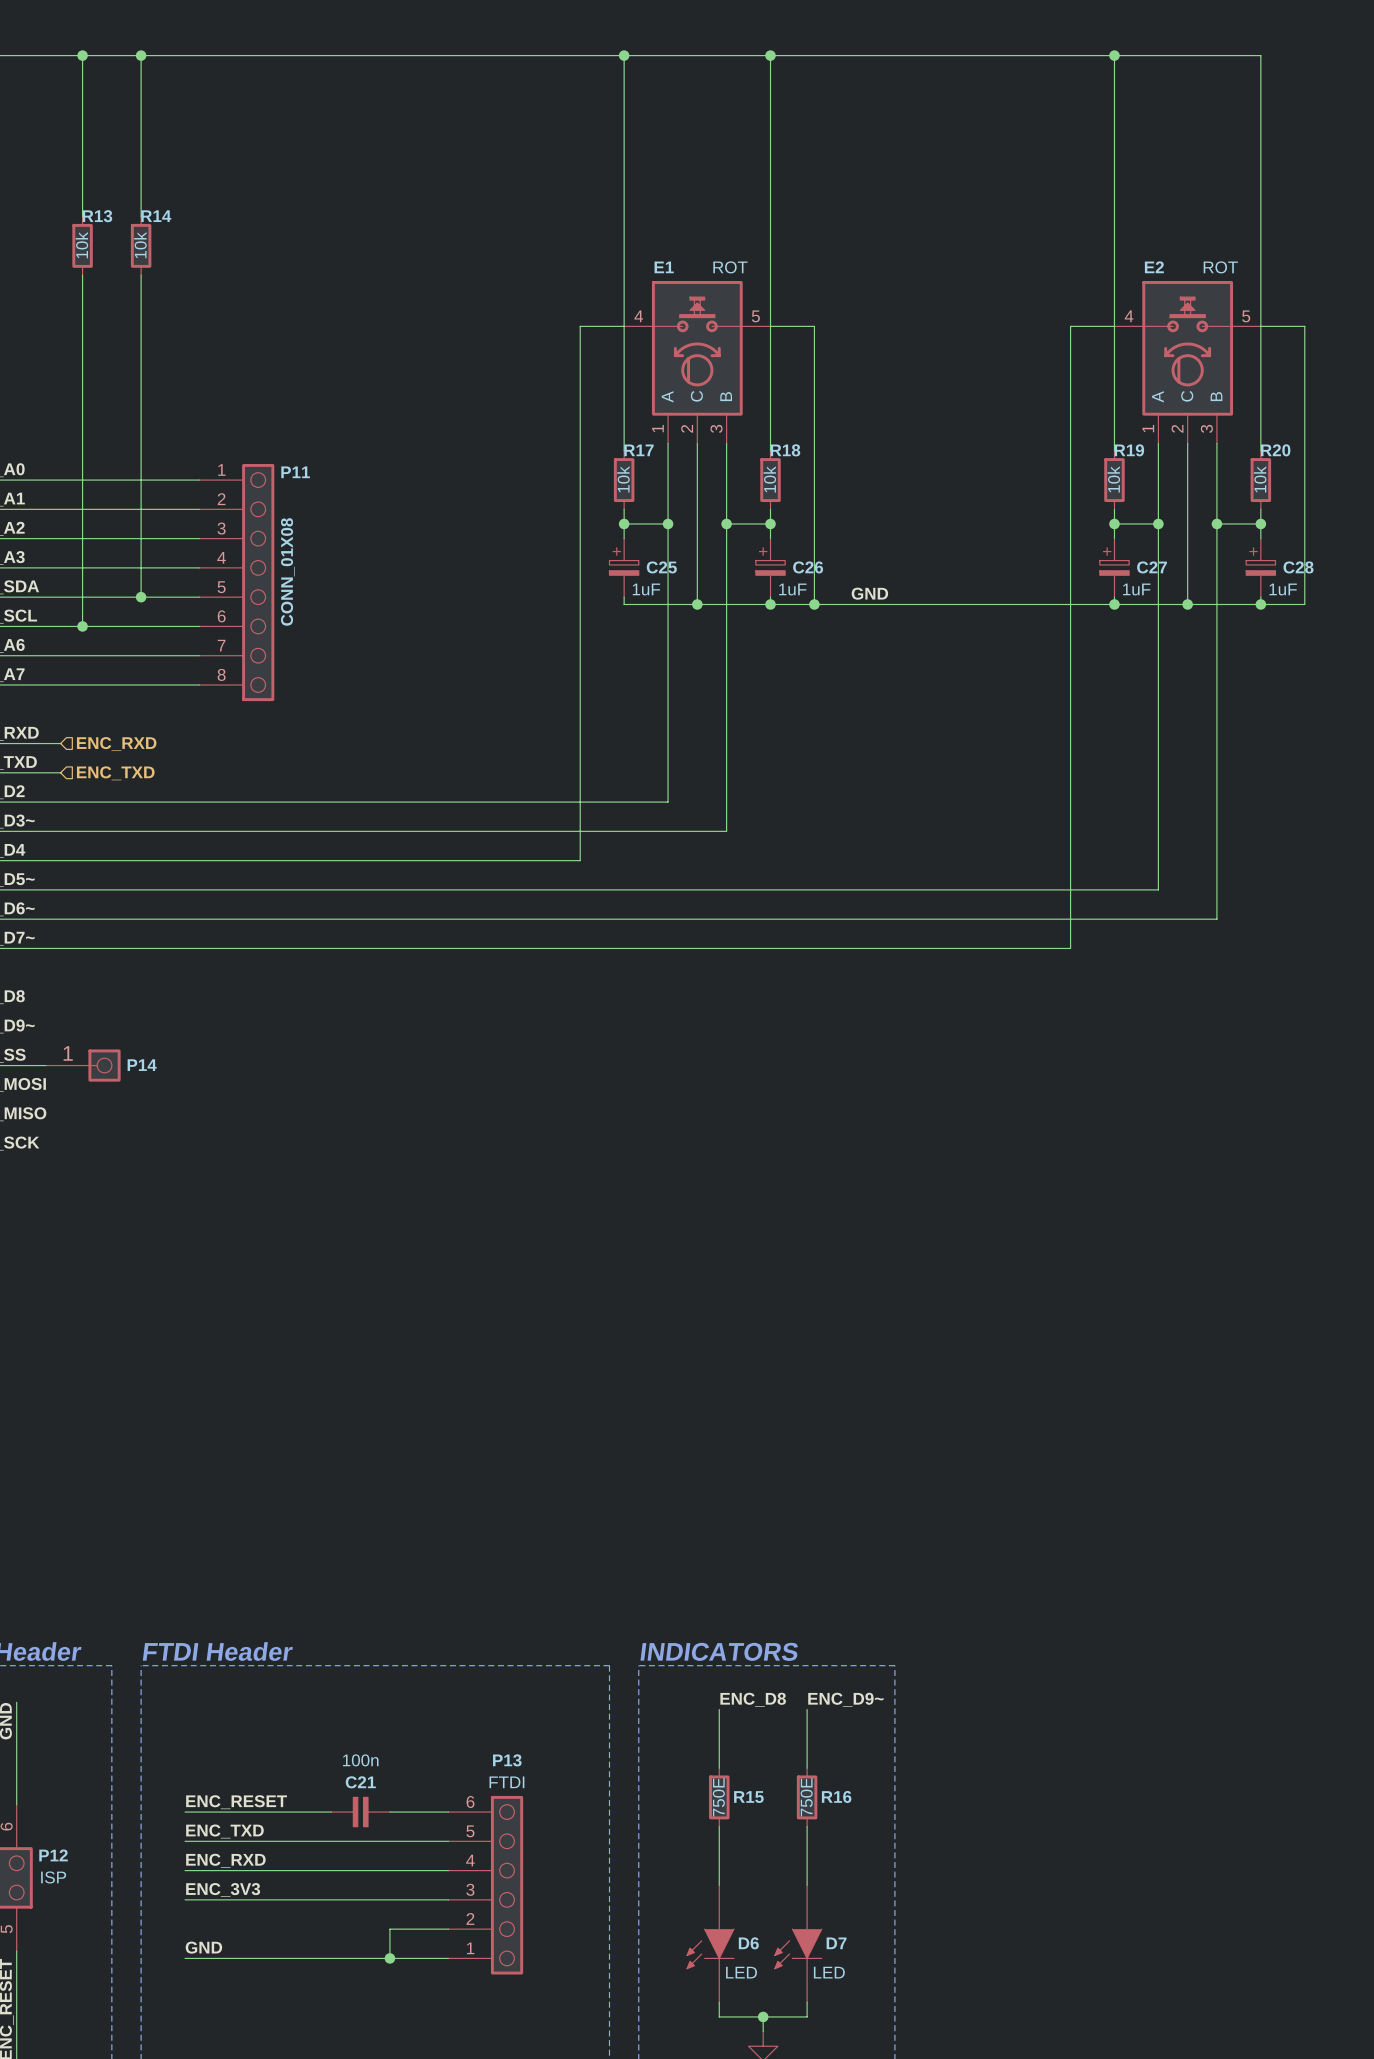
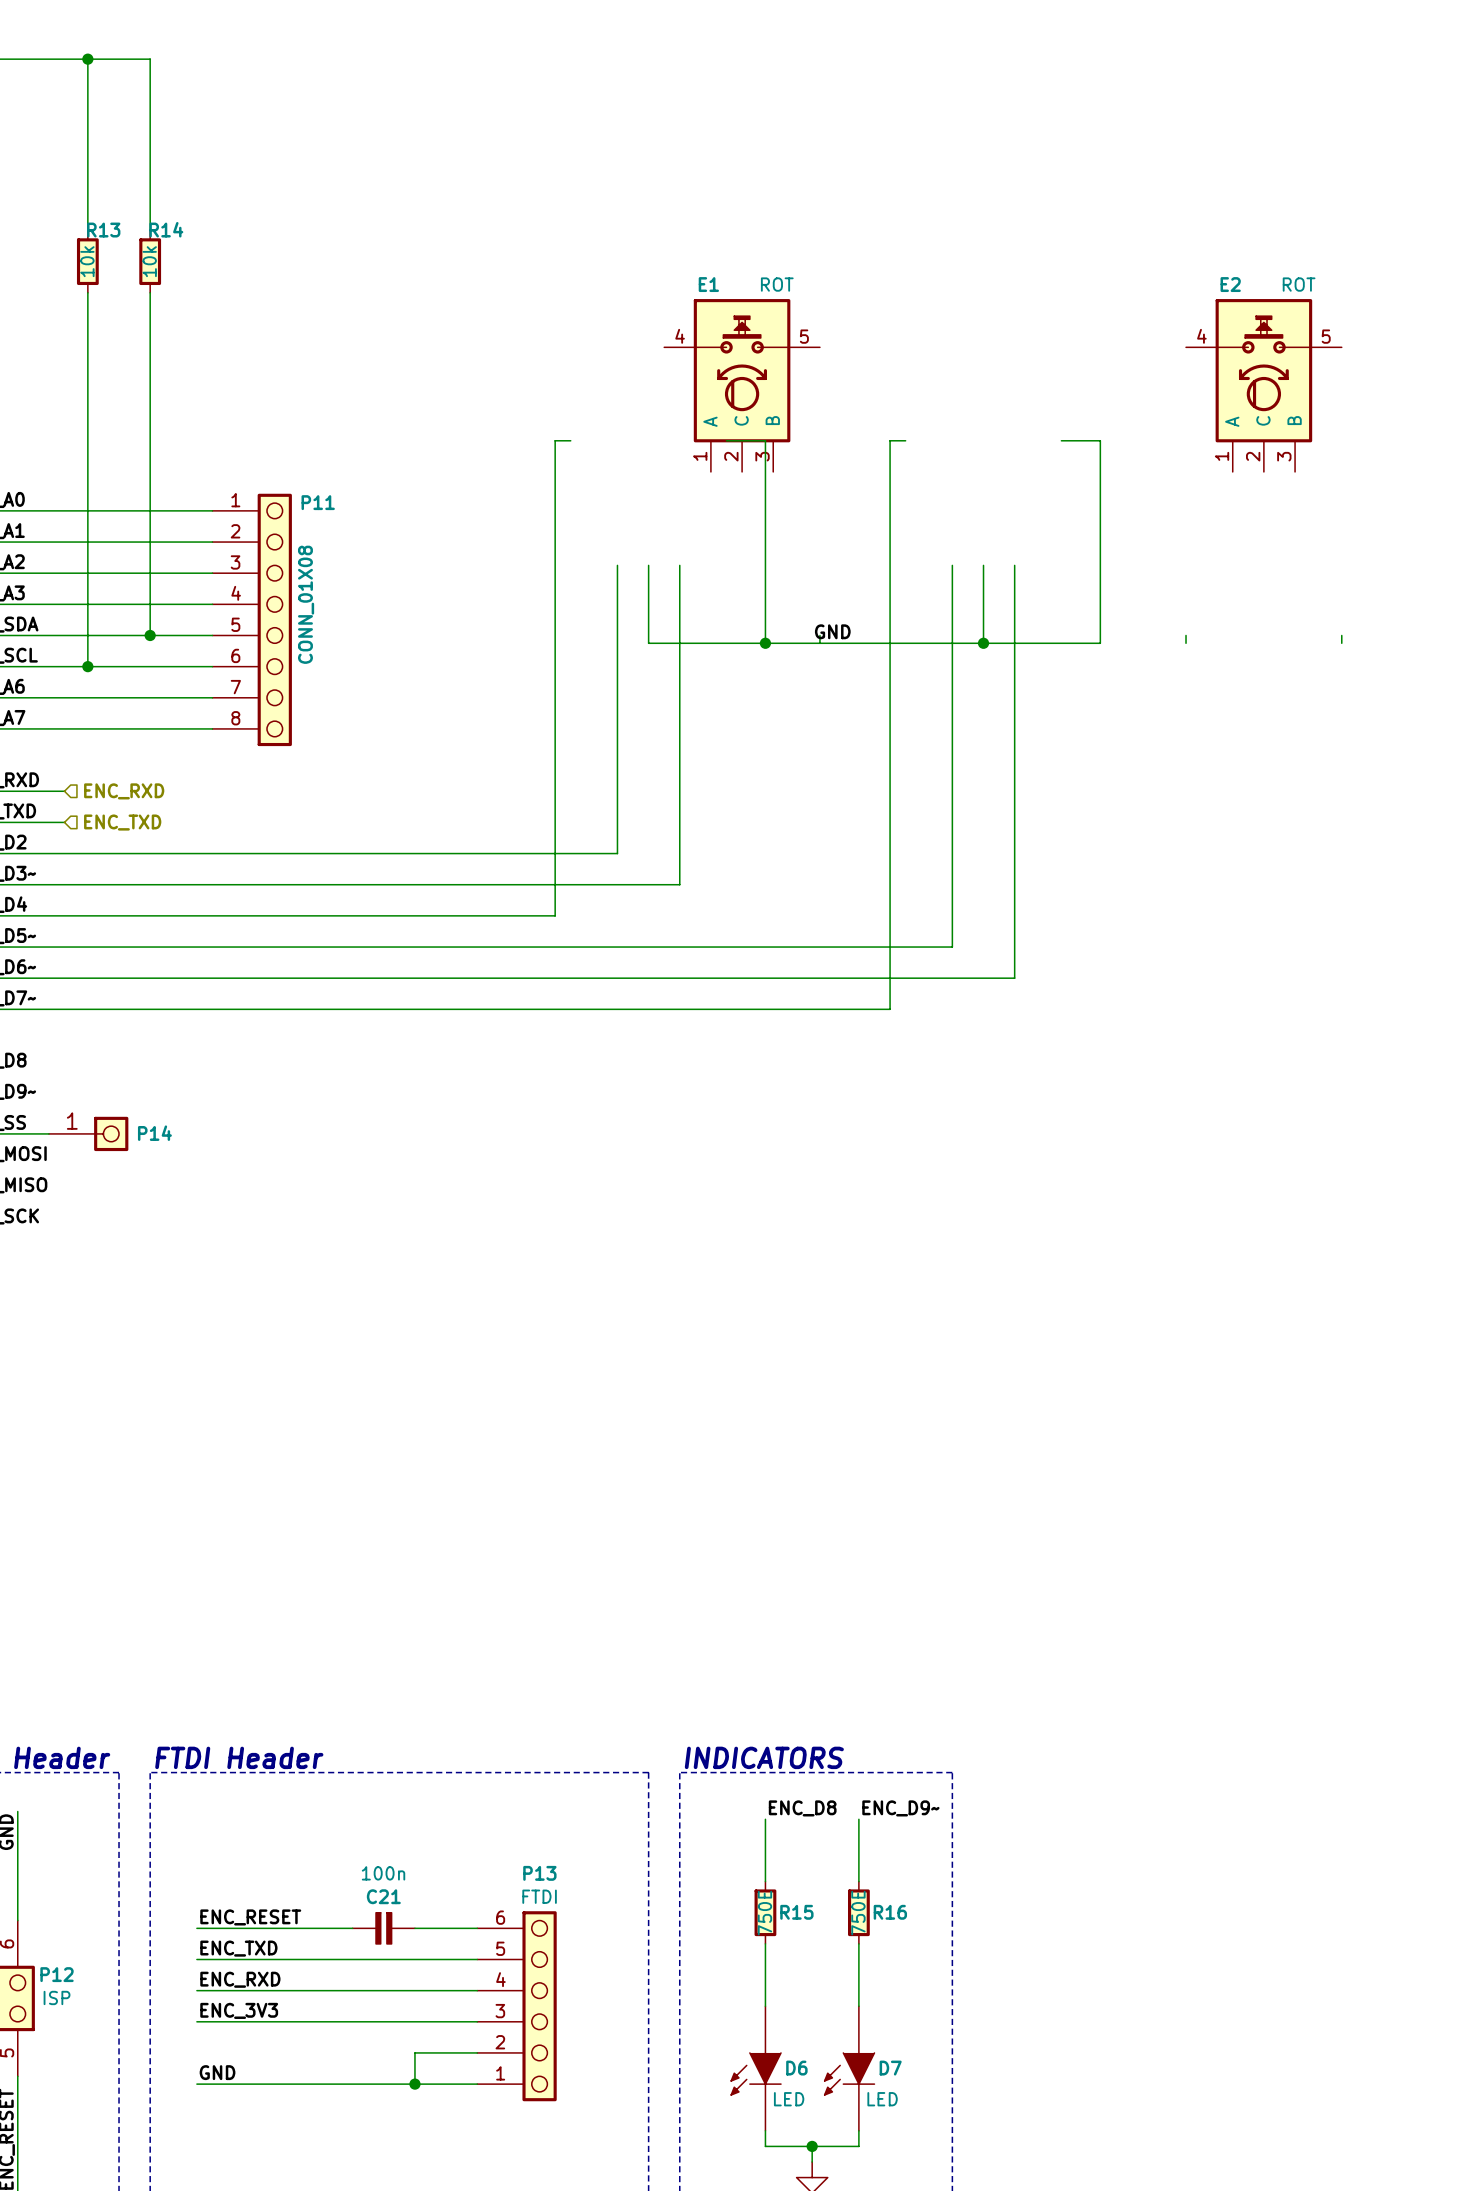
wire: (141, 55) (1260, 55) (1260, 450) -> none
junction: (141, 55) -> none
wire: (624, 55) (624, 450) -> none
junction: (624, 55) -> none
wire: (770, 55) (770, 450) -> none
junction: (770, 55) -> none
wire: (1114, 55) (1114, 450) -> none
junction: (1114, 55) -> none
wire: (624, 326) (580, 326) (580, 531) -> none
wire: (770, 326) (814, 326) (814, 604) -> none
wire: (1114, 326) (1070, 326) (1070, 948) (836, 948) -> (905, 440) (890, 440) (890, 1009)
wire: (1260, 326) (1304, 326) (1304, 604) (1033, 604) -> (1061, 440) (1100, 440) (1100, 643)
wire: none -> (726, 440) (765, 440) (765, 643)
wire: (668, 443) (668, 802) (580, 802) (580, 860) (521, 860) -> (570, 440) (555, 440) (555, 915)
wire: (697, 443) (697, 604) -> none
wire: (726, 443) (726, 831) (638, 831) -> (679, 565) (679, 884)
wire: (1158, 443) (1158, 889) (894, 889) -> (952, 565) (952, 947)
wire: (1187, 443) (1187, 604) -> none
wire: (1216, 443) (1216, 919) (953, 919) -> (1014, 565) (1014, 978)
R17: 10k (624, 480) -> none
R18: 10k (770, 480) -> none
R19: 10k (1114, 480) -> none
R20: 10k (1260, 480) -> none
wire: (624, 509) (624, 538) -> none
wire: (770, 509) (770, 538) -> none
wire: (1114, 509) (1114, 538) -> none
wire: (1260, 509) (1260, 538) -> none
wire: (624, 523) (668, 523) -> none
junction: (624, 523) -> none
junction: (668, 523) -> none
wire: (726, 523) (770, 523) -> none
junction: (726, 523) -> none
junction: (770, 523) -> none
wire: (1114, 523) (1158, 523) -> none
junction: (1114, 523) -> none
junction: (1158, 523) -> none
wire: (1216, 523) (1260, 523) -> none
junction: (1216, 523) -> none
junction: (1260, 523) -> none
wire: none -> (983, 565) (983, 643)
C25: 1uF (624, 567) -> none
C26: 1uF (770, 567) -> none
C27: 1uF (1114, 567) -> none
C28: 1uF (1260, 567) -> none
label position: GND (869, 593) -> GND (832, 631)
wire: (624, 597) (624, 604) -> (648, 565) (648, 643) (664, 643)
junction position: (697, 604) -> (765, 643)
junction: (770, 604) -> none
junction: (814, 604) -> none
junction: none -> (983, 643)
junction: (1114, 604) -> none
junction: (1187, 604) -> none
junction: (1260, 604) -> none

